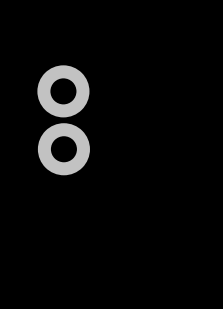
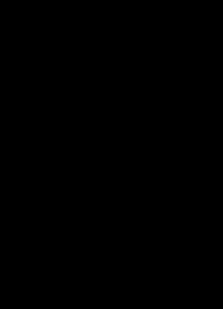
via: (63, 91) -> none
via: (63, 149) -> none

